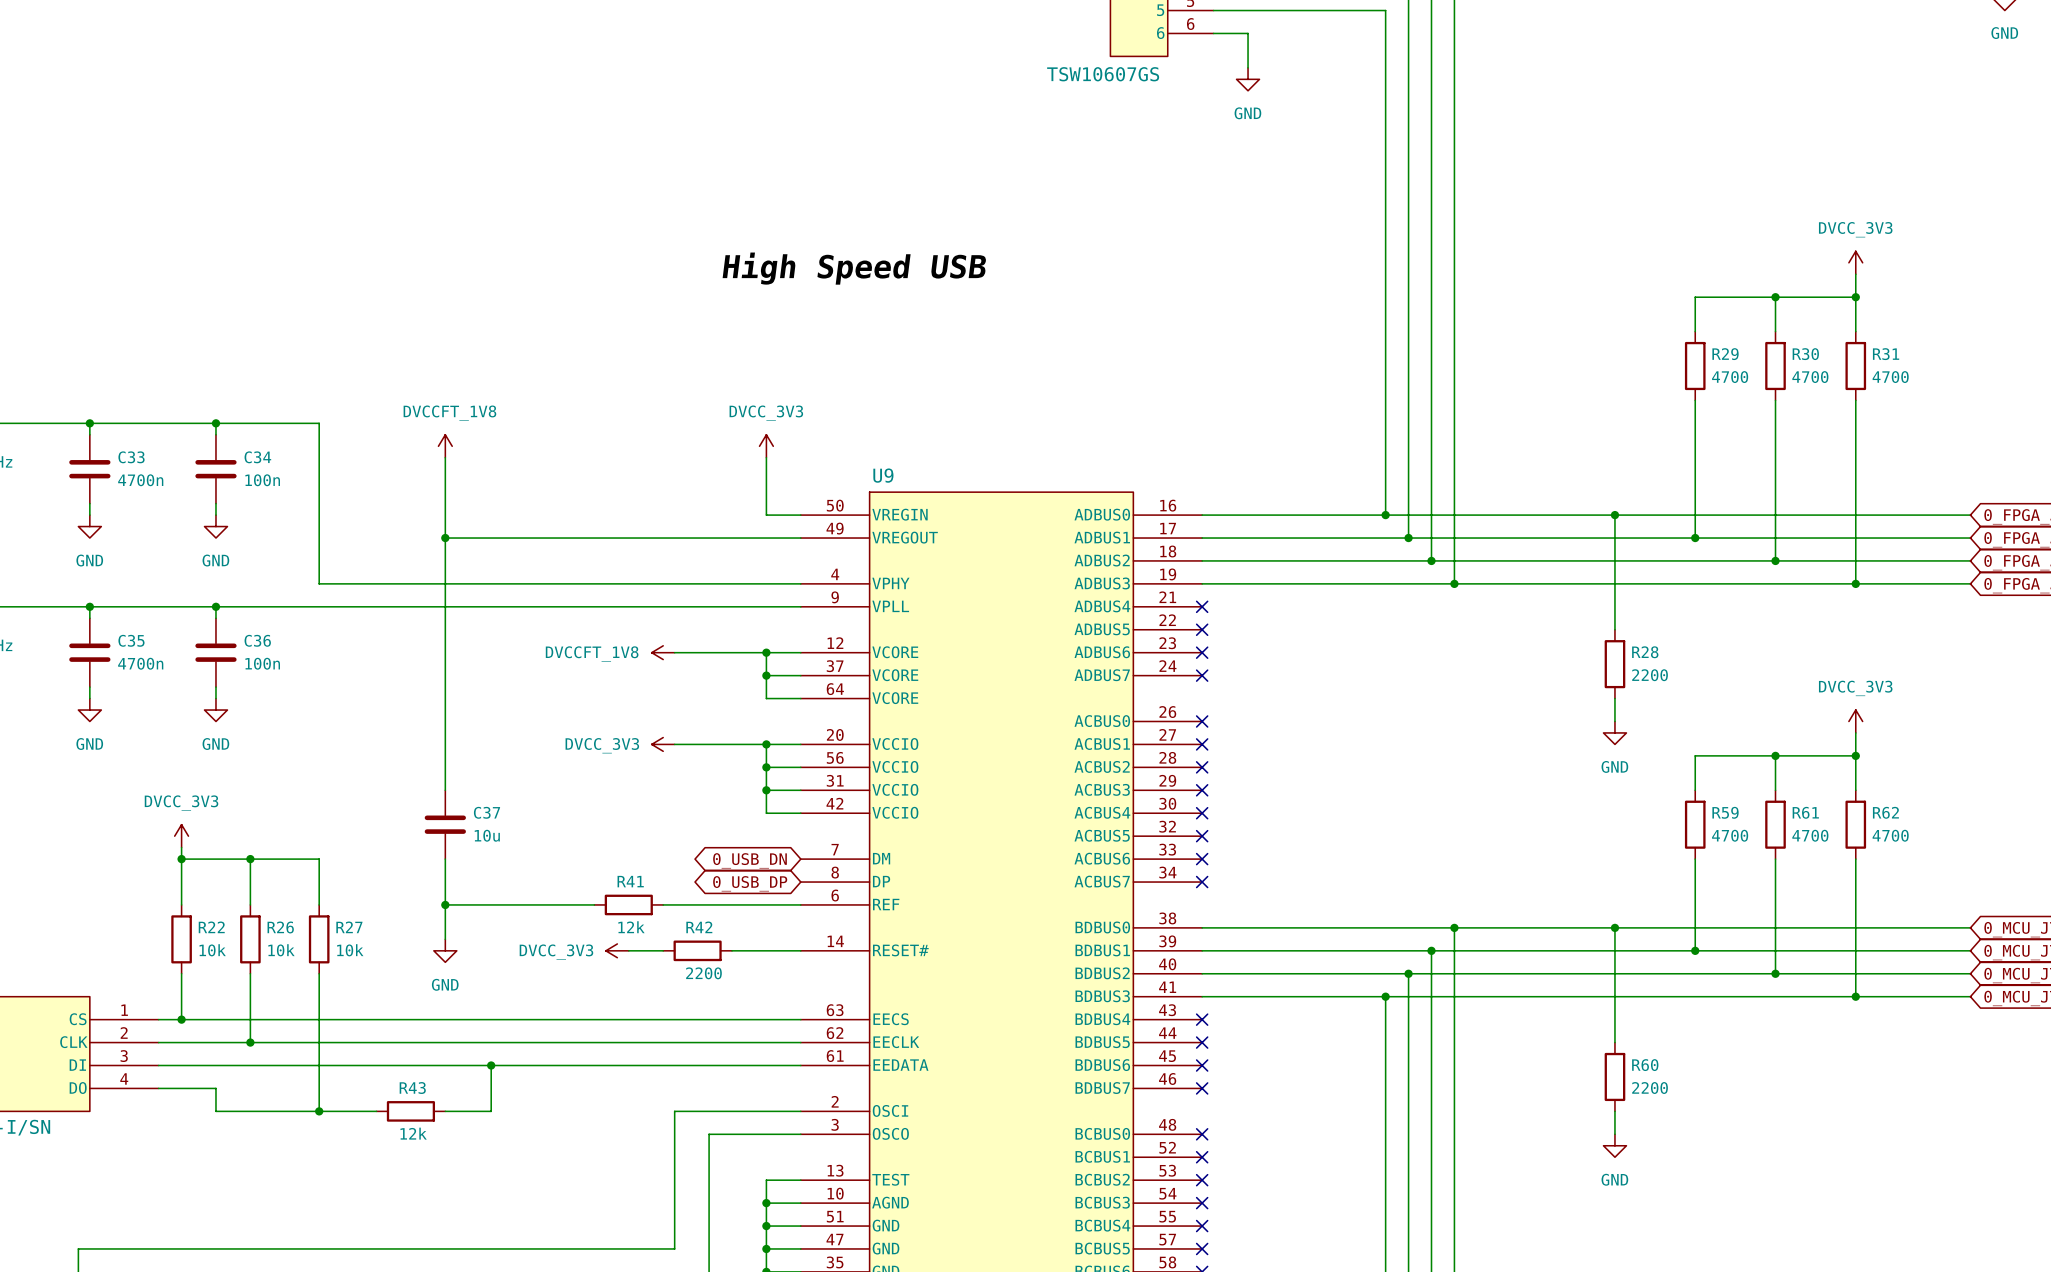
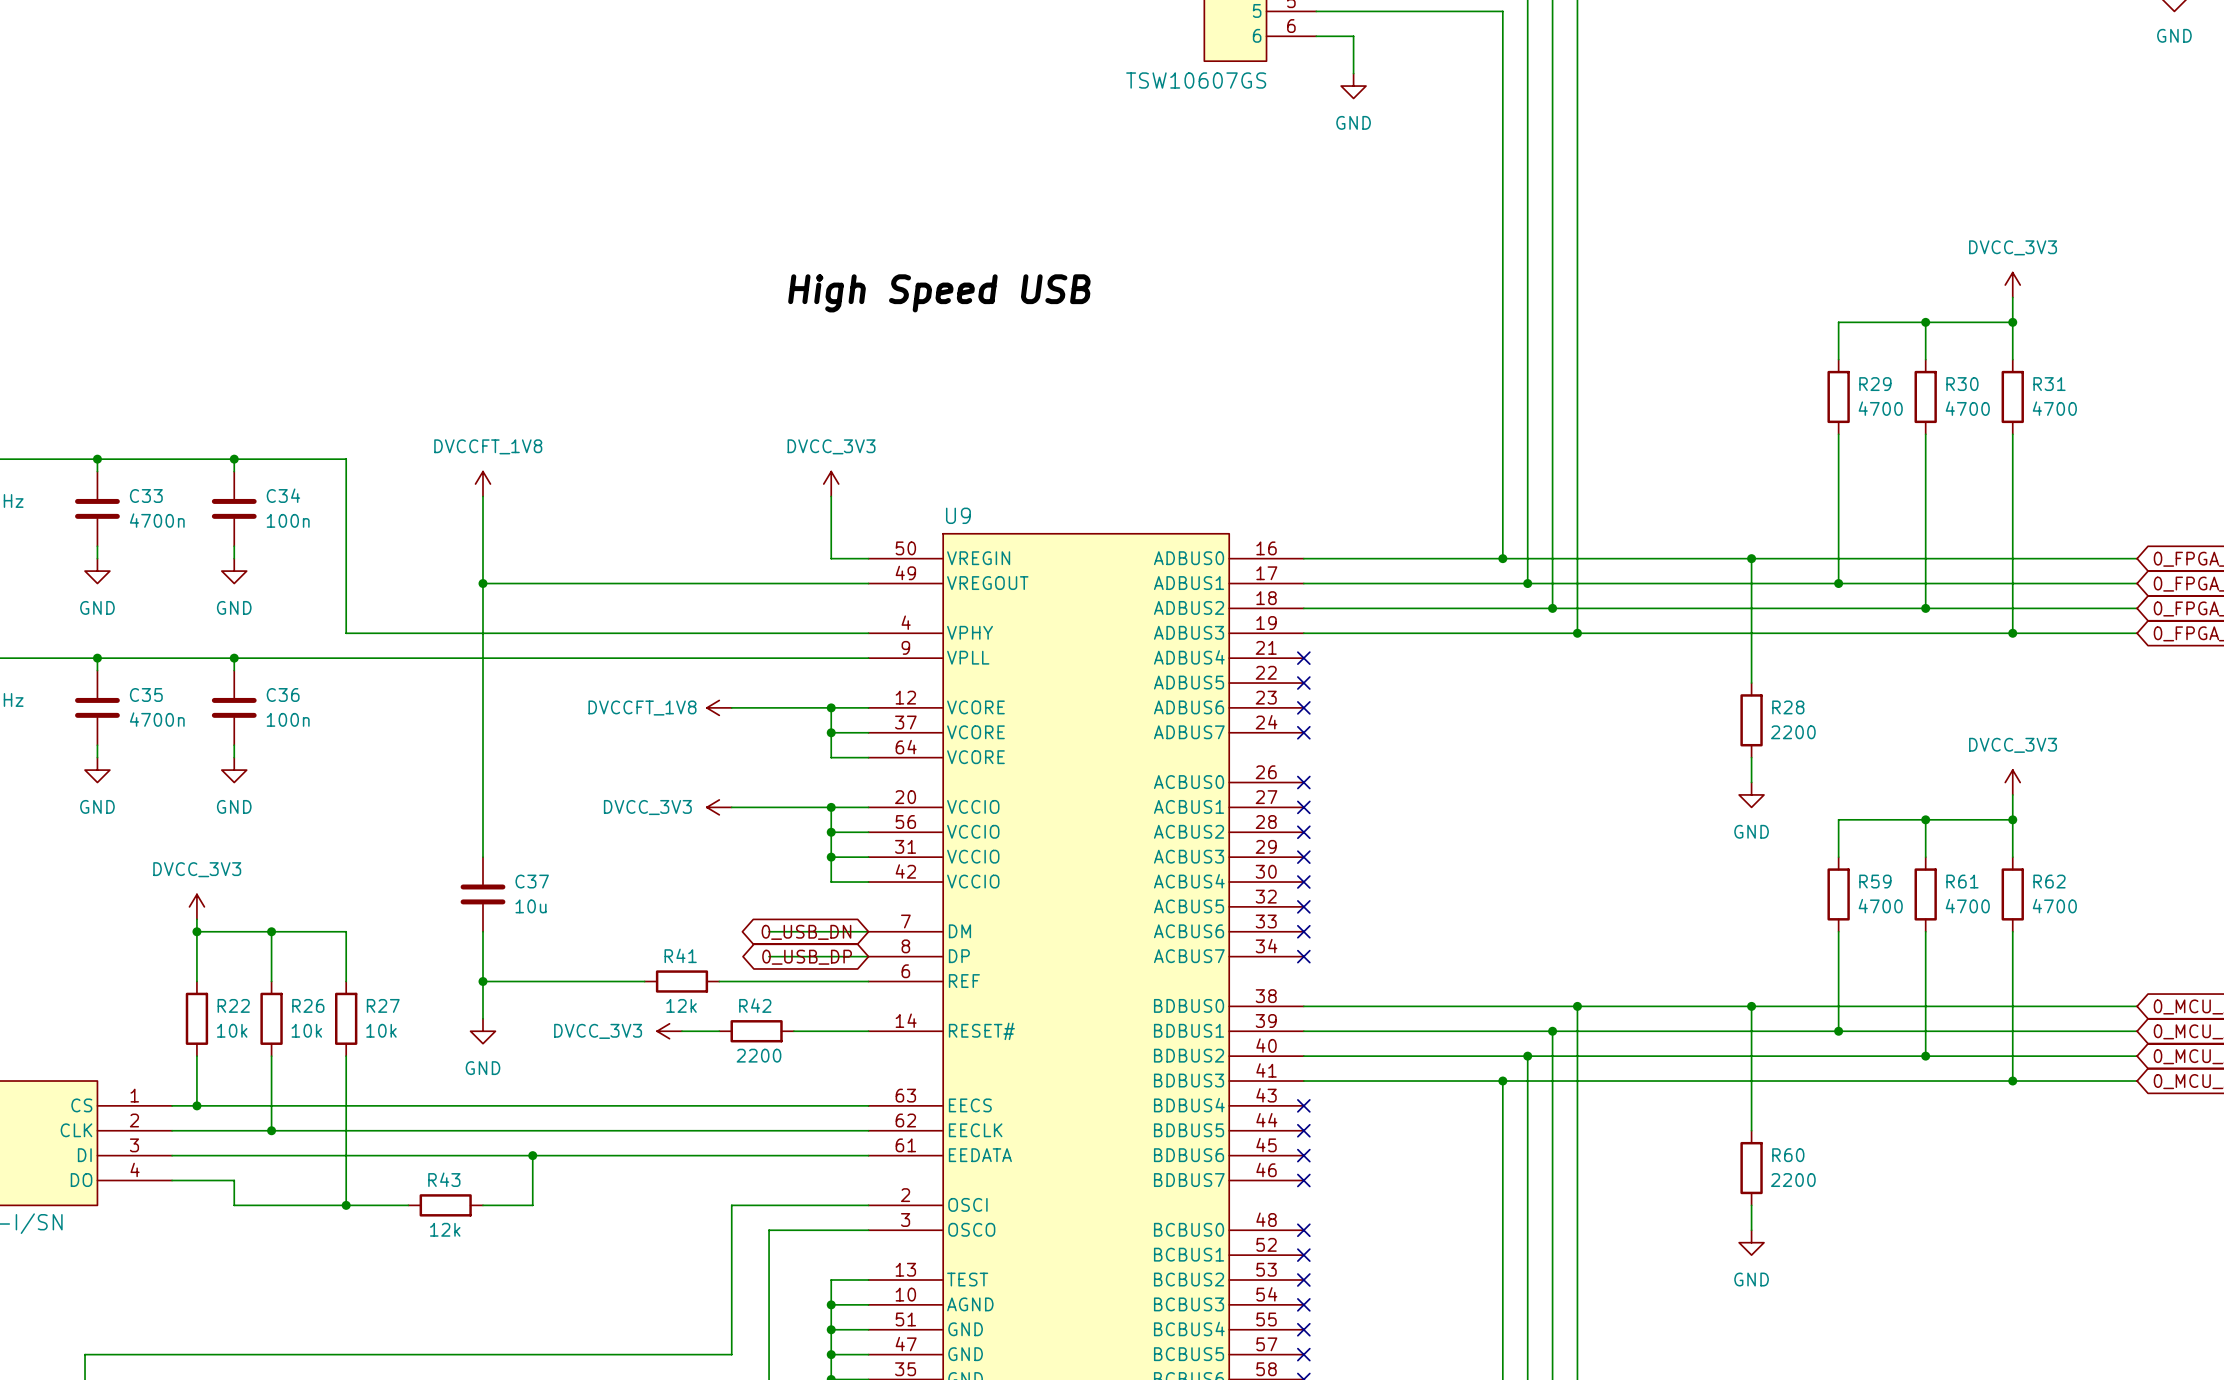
wire: none -> (769, 931) (868, 931)
wire: none -> (769, 956) (868, 956)

